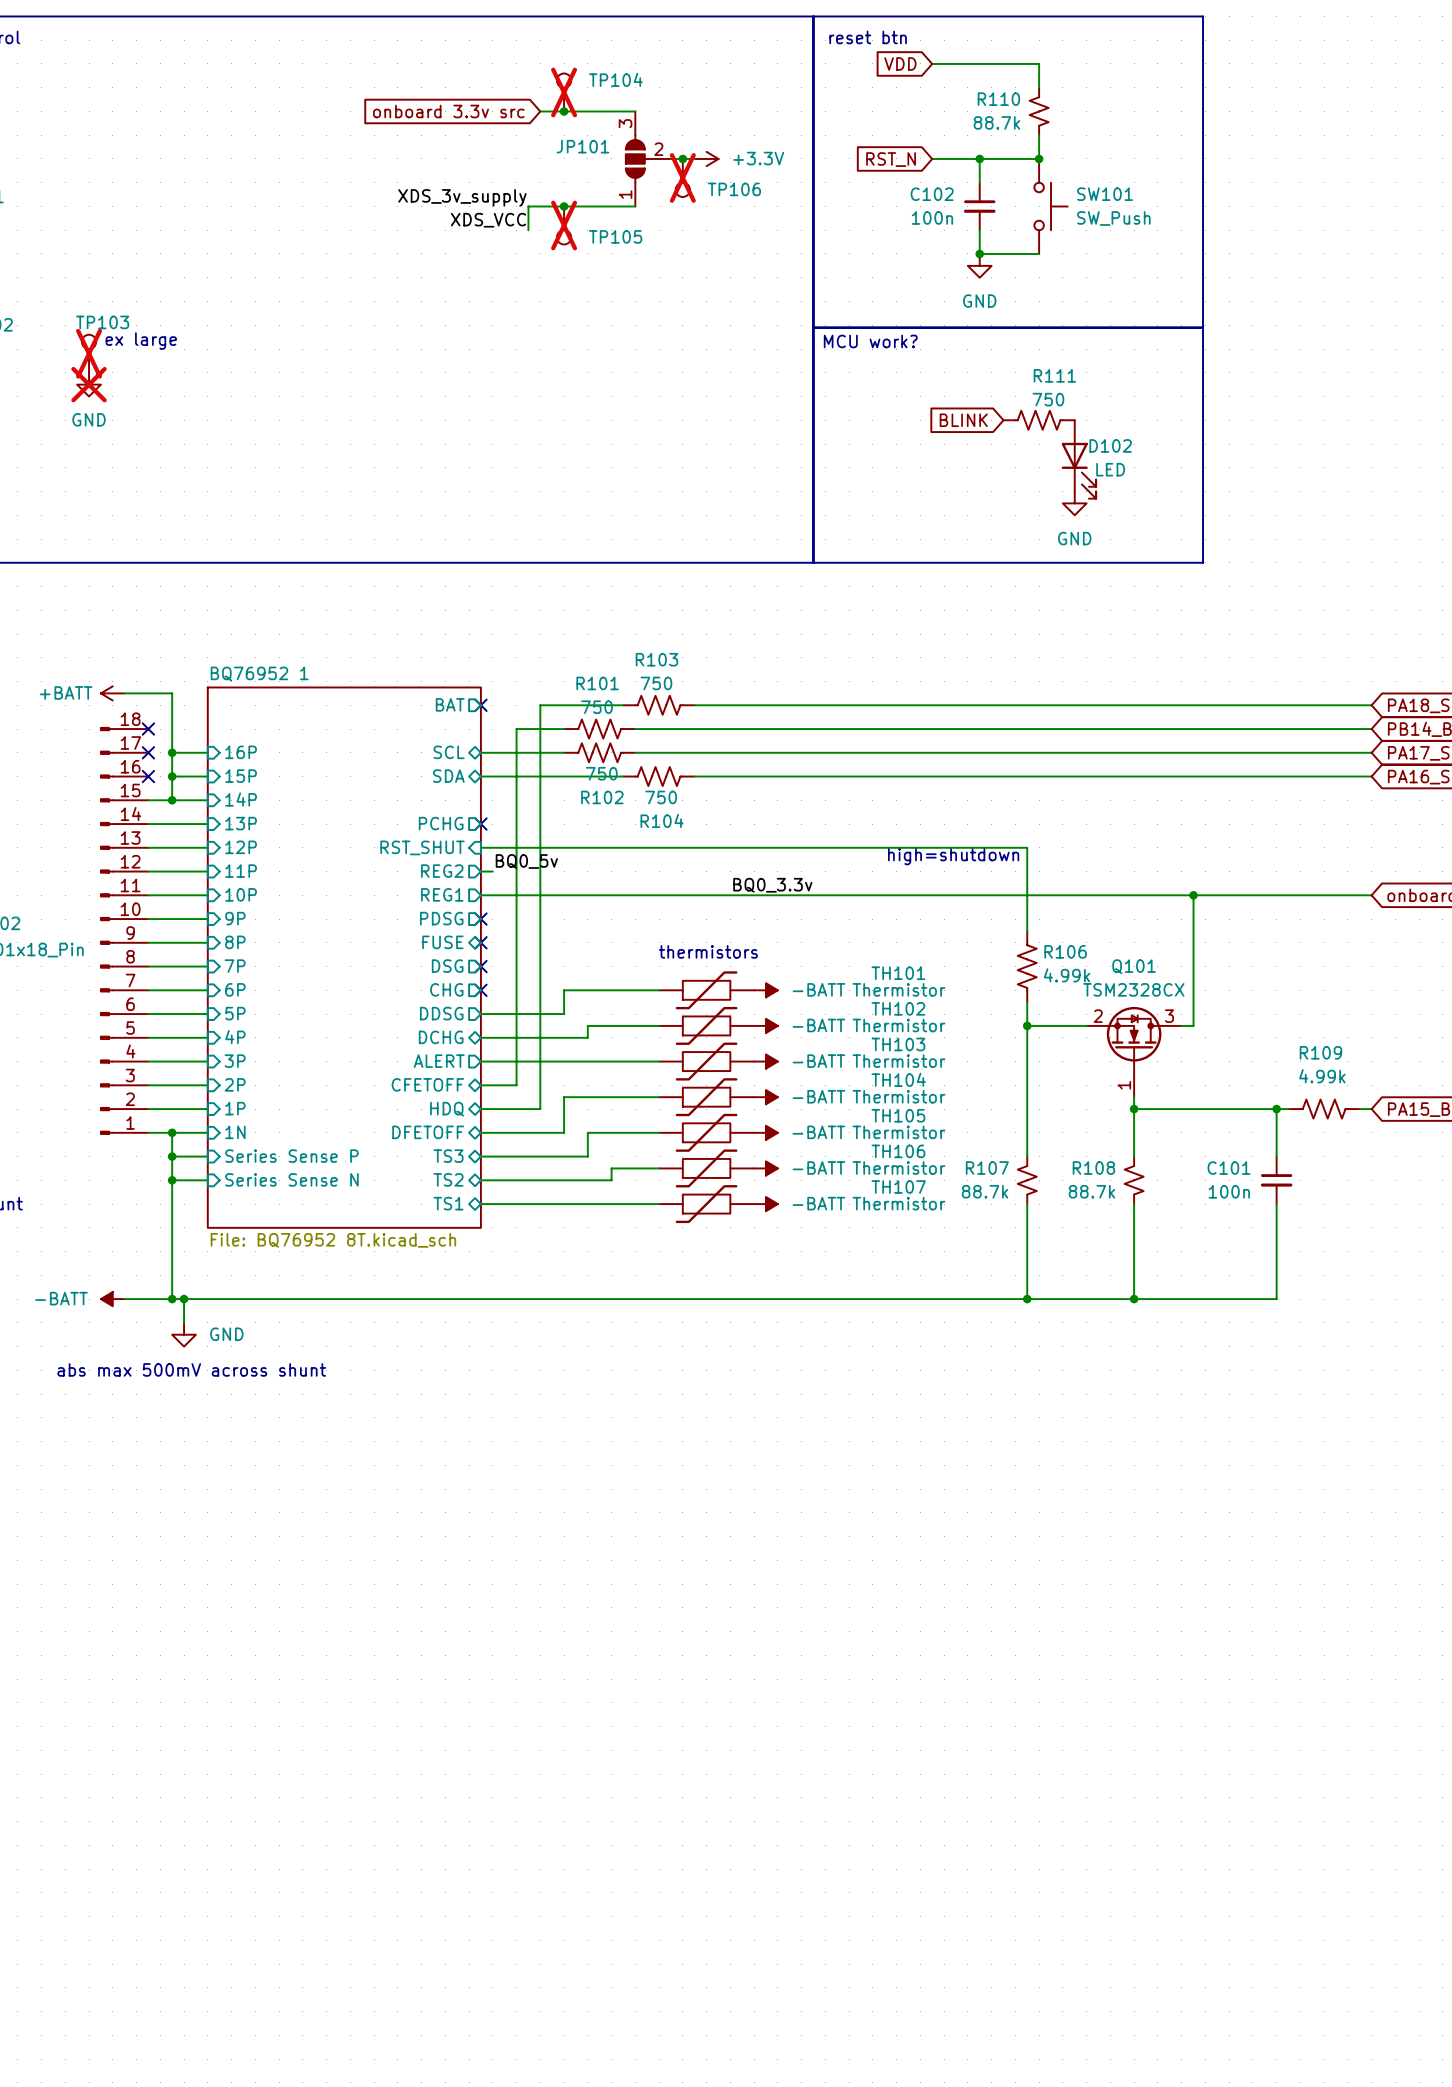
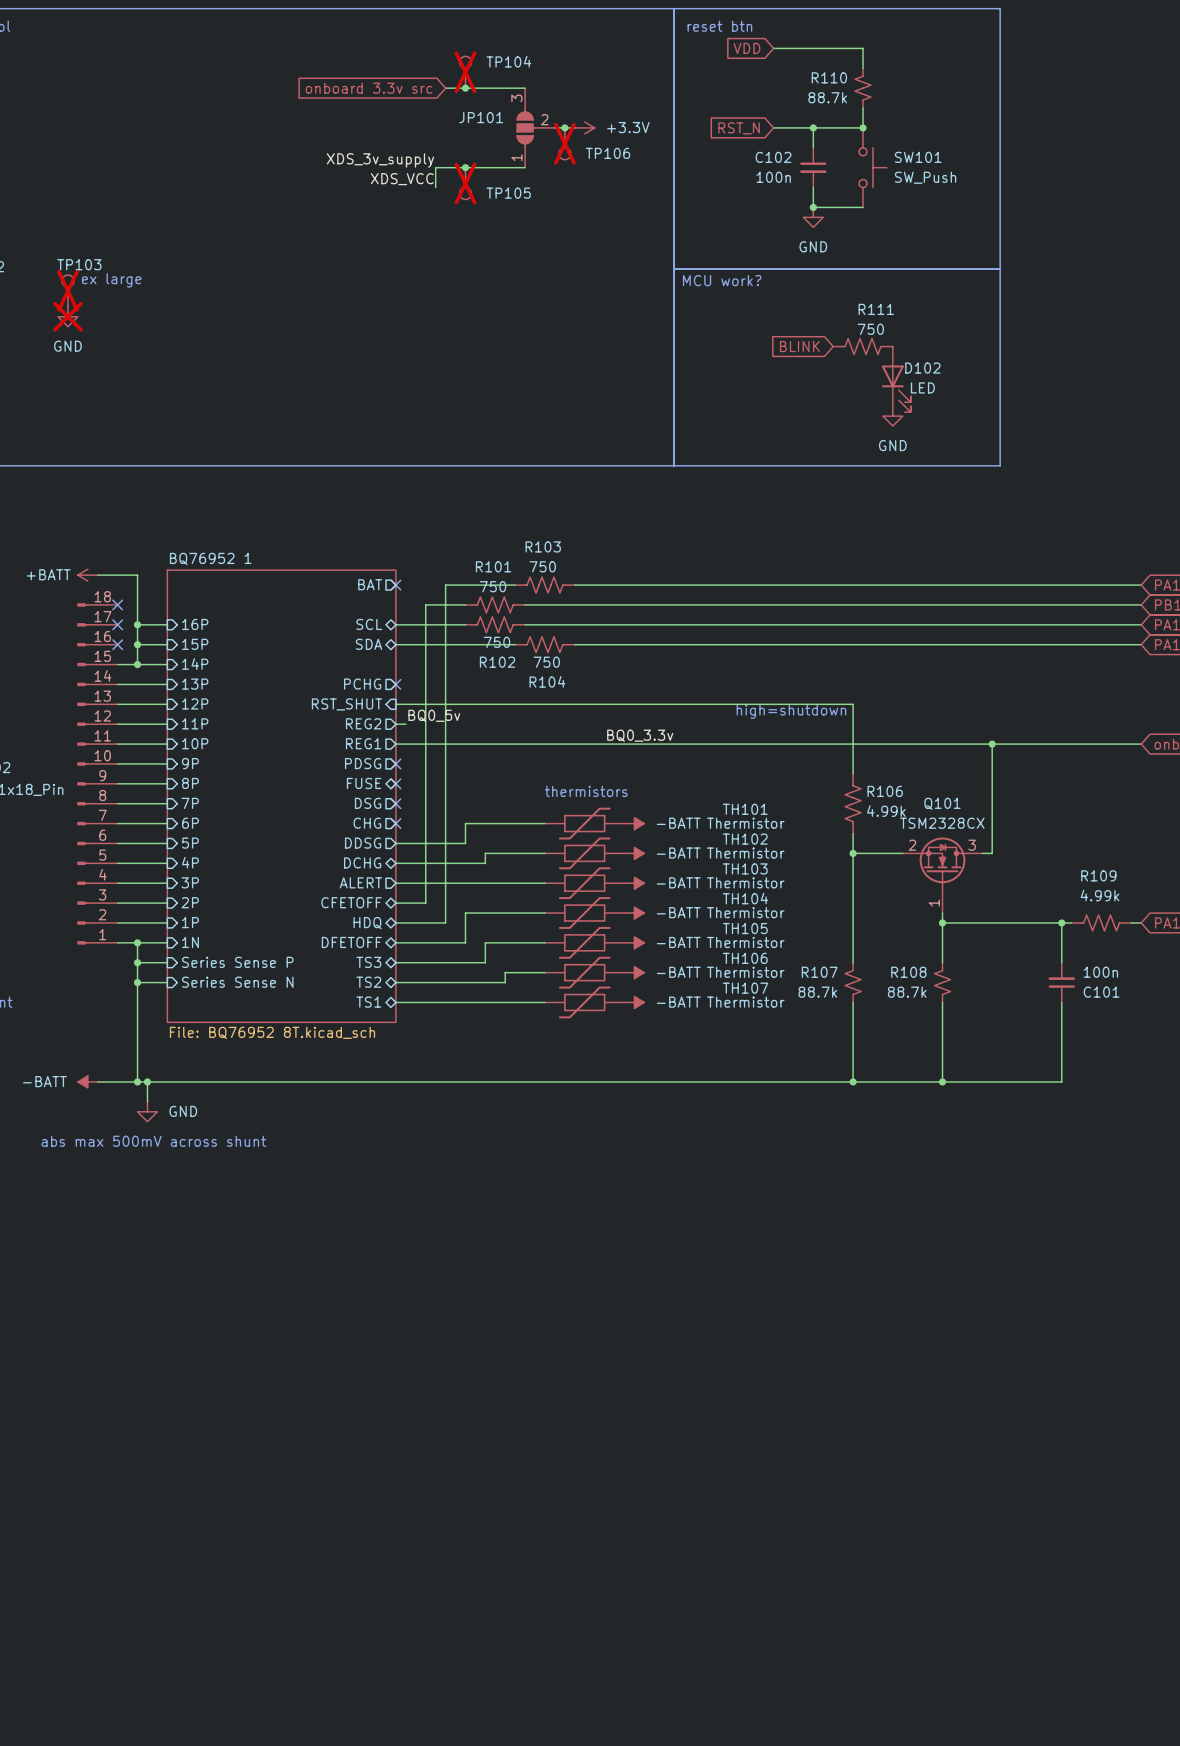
C101 rotation: 0° (1276, 1180) -> 180° (1061, 982)

